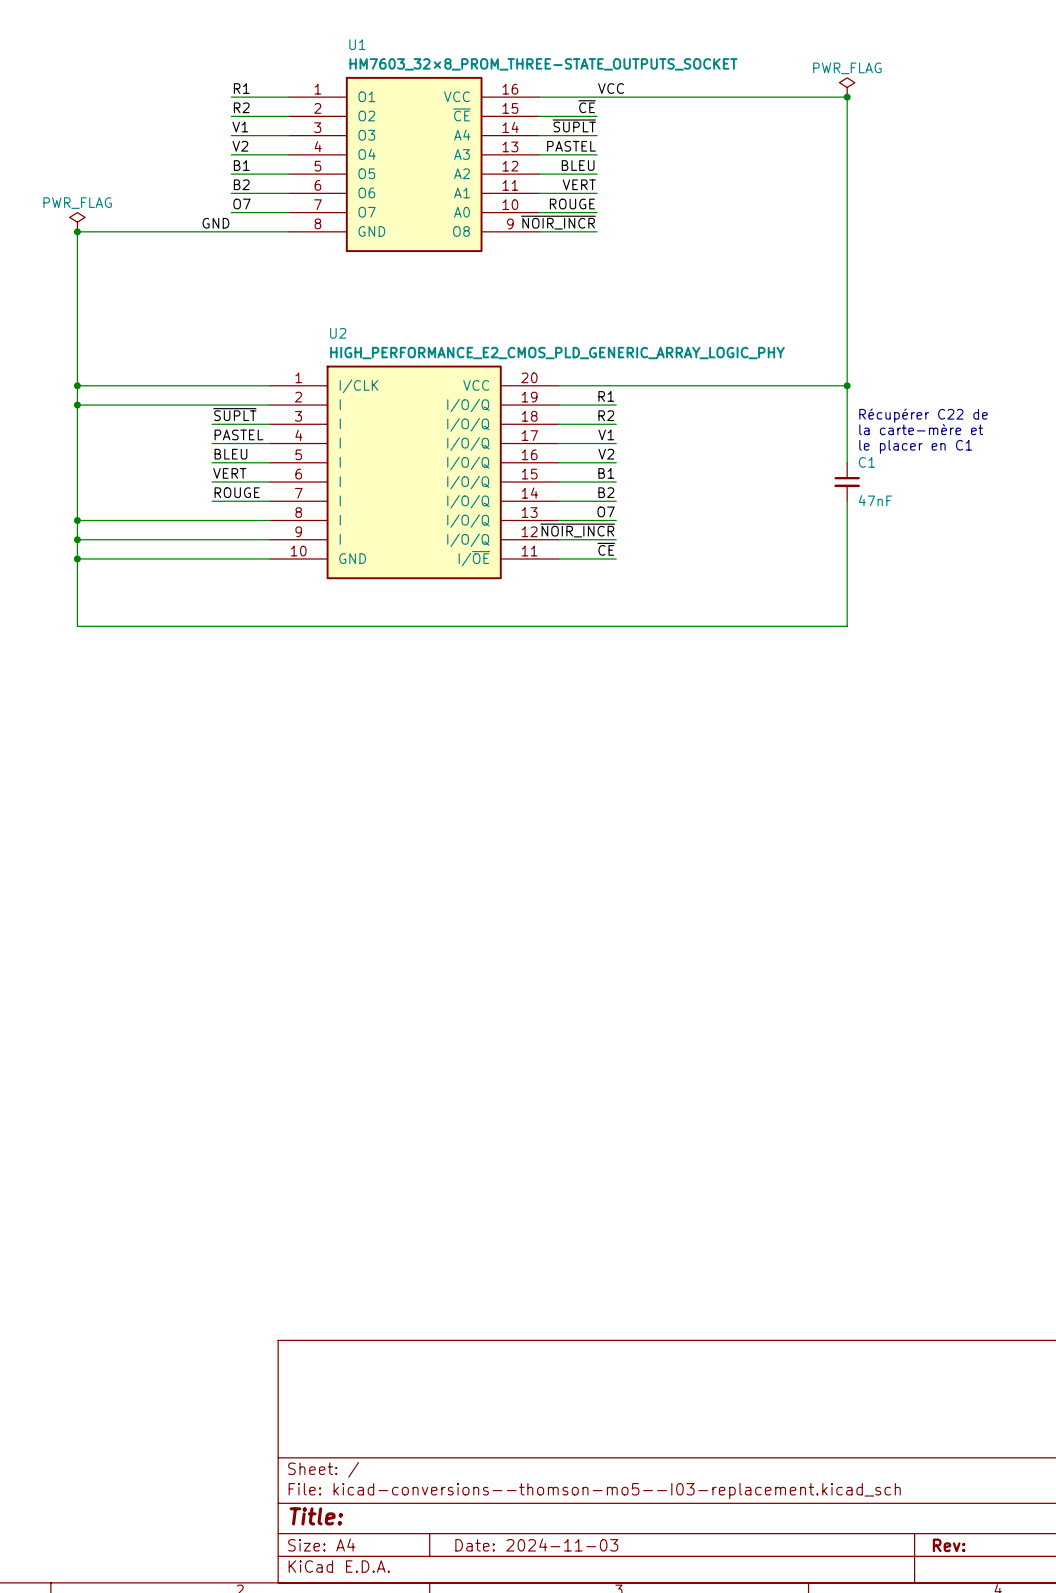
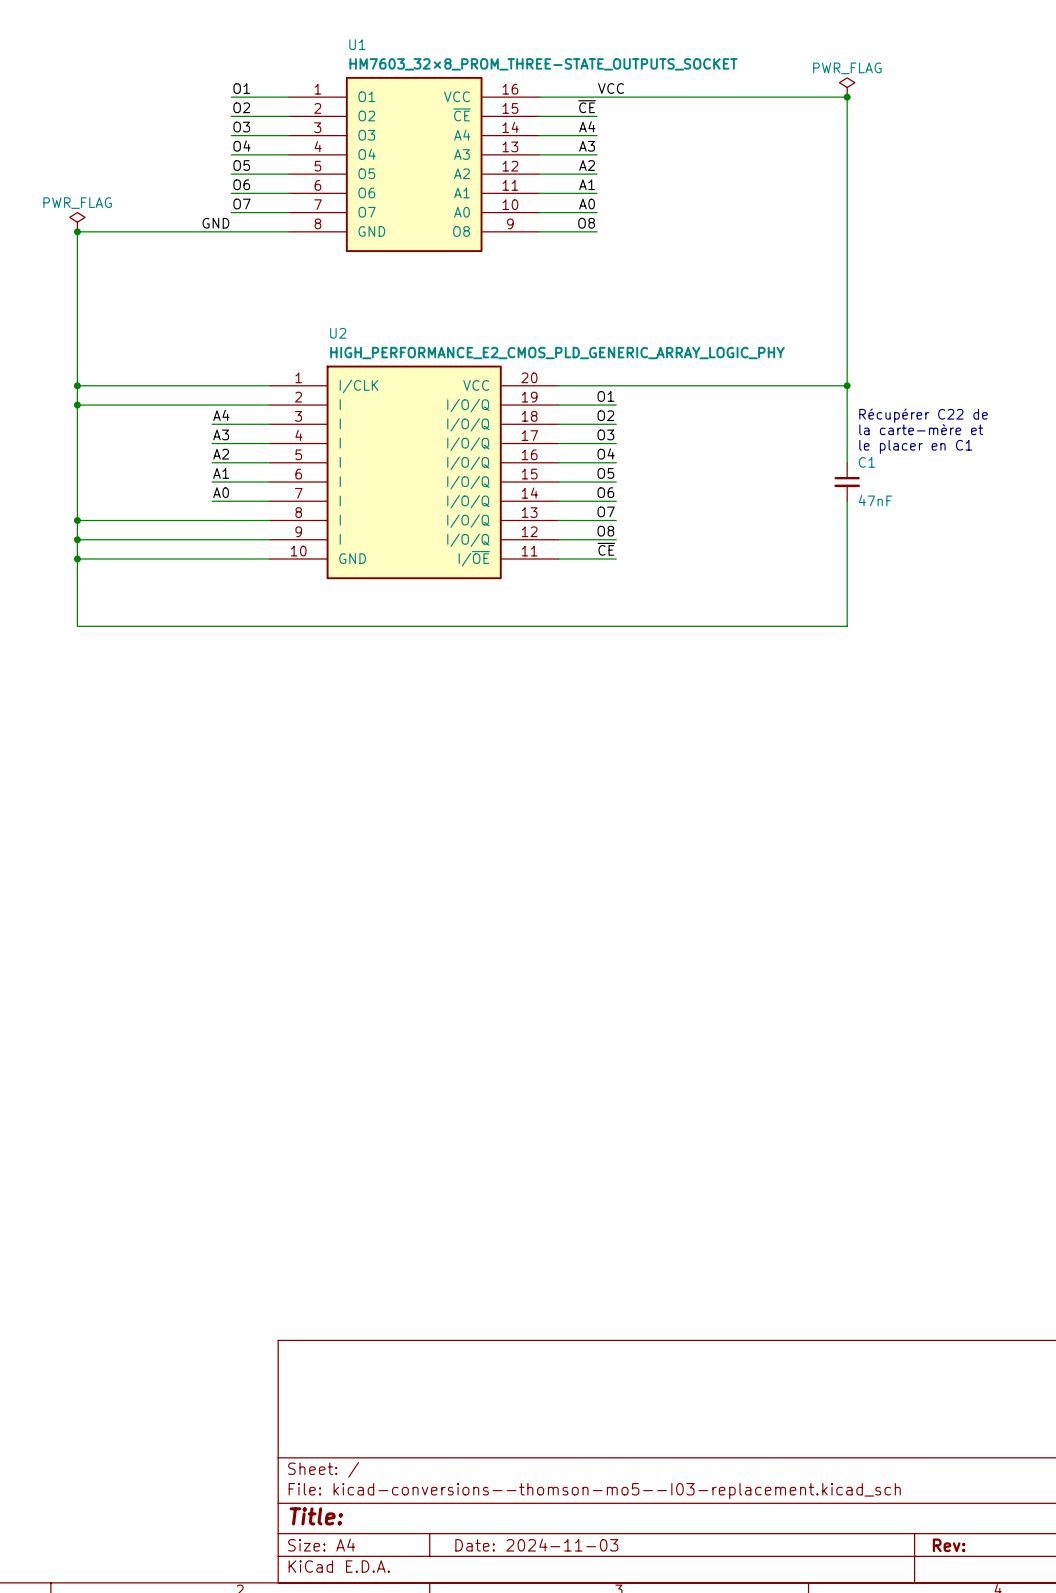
label: R1 (241, 88) -> O1 (241, 88)
label: R2 (241, 107) -> O2 (241, 107)
label: ~{SUPLT} (574, 125) -> A4 (587, 126)
label: V1 (240, 127) -> O3 (241, 127)
label: V2 (240, 146) -> O4 (241, 146)
label: PASTEL (571, 146) -> A3 (587, 146)
label: B1 (241, 165) -> O5 (241, 165)
label: BLEU (578, 165) -> A2 (587, 165)
label: B2 (241, 184) -> O6 (241, 184)
label: VERT (579, 184) -> A1 (587, 184)
label: ROUGE (572, 204) -> A0 (587, 204)
label: ~{NOIR_INCR} (558, 222) -> O8 (586, 223)
label: R1 (606, 396) -> O1 (605, 396)
label: ~{SUPLT} (234, 414) -> A4 (221, 415)
label: R2 (606, 415) -> O2 (605, 415)
label: PASTEL (238, 434) -> A3 (221, 434)
label: V1 (606, 434) -> O3 (605, 434)
label: BLEU (230, 454) -> A2 (221, 454)
label: V2 (606, 454) -> O4 (606, 453)
label: VERT (229, 473) -> A1 (221, 473)
label: B1 (606, 473) -> O5 (605, 473)
label: ROUGE (237, 492) -> A0 (221, 492)
label: B2 (606, 492) -> O6 (605, 492)
label: ~{NOIR_INCR} (577, 530) -> O8 (605, 531)

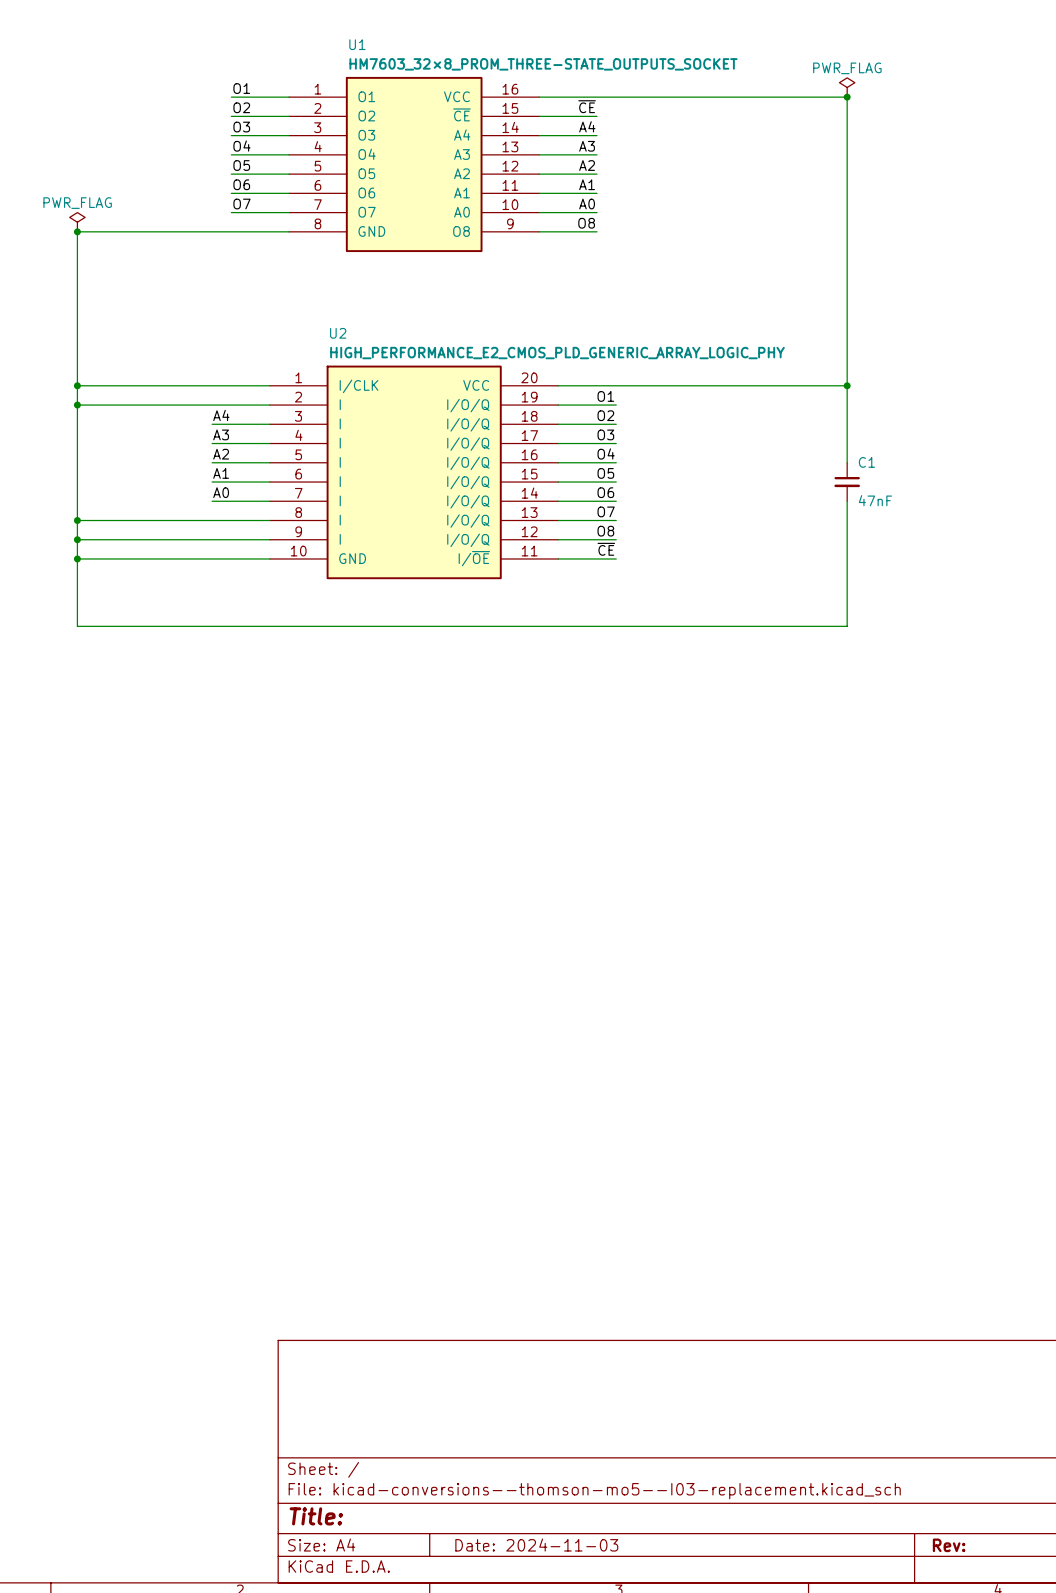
label: VCC (611, 88) -> none
label: GND (215, 223) -> none
text: Récupérer C22 de (923, 415) -> none
text: la carte-mère et (921, 429) -> none
text: le placer en C1 (915, 446) -> none

